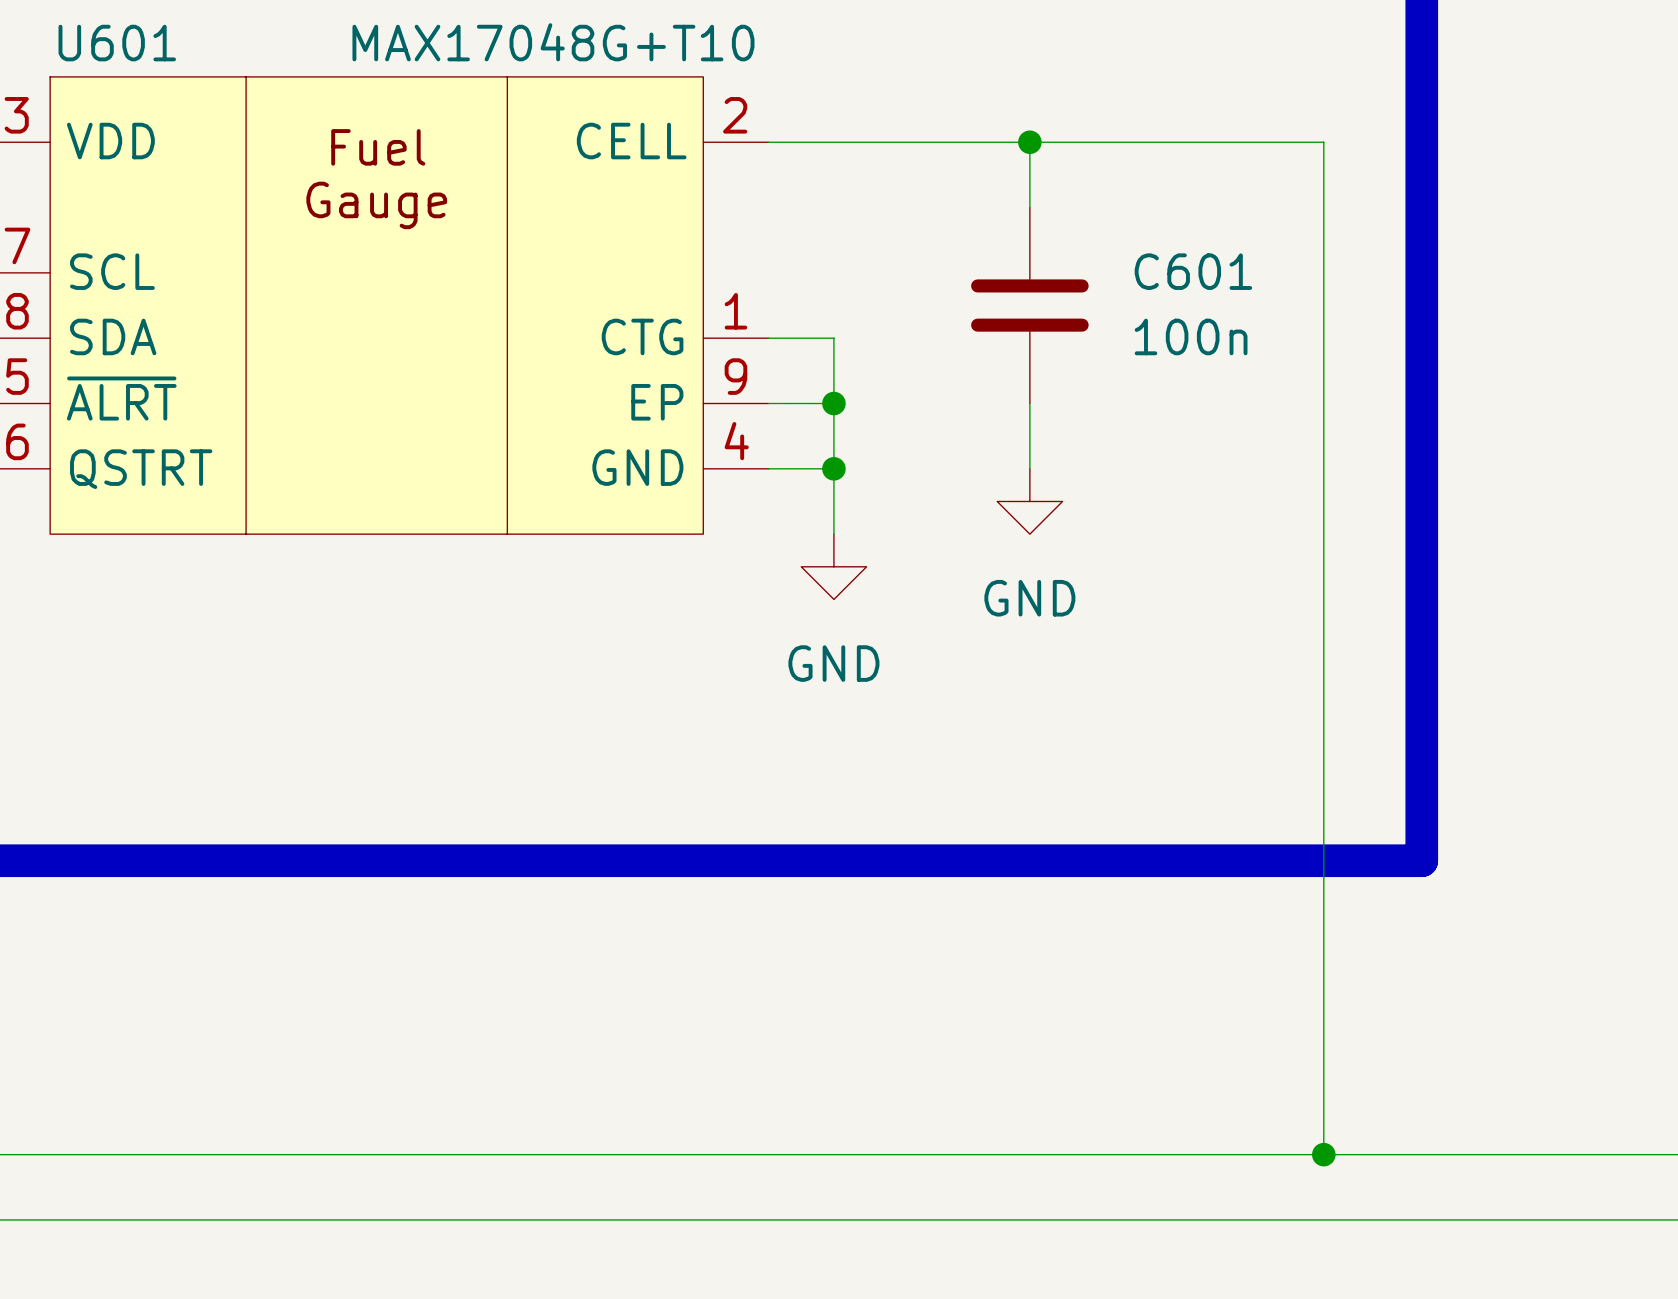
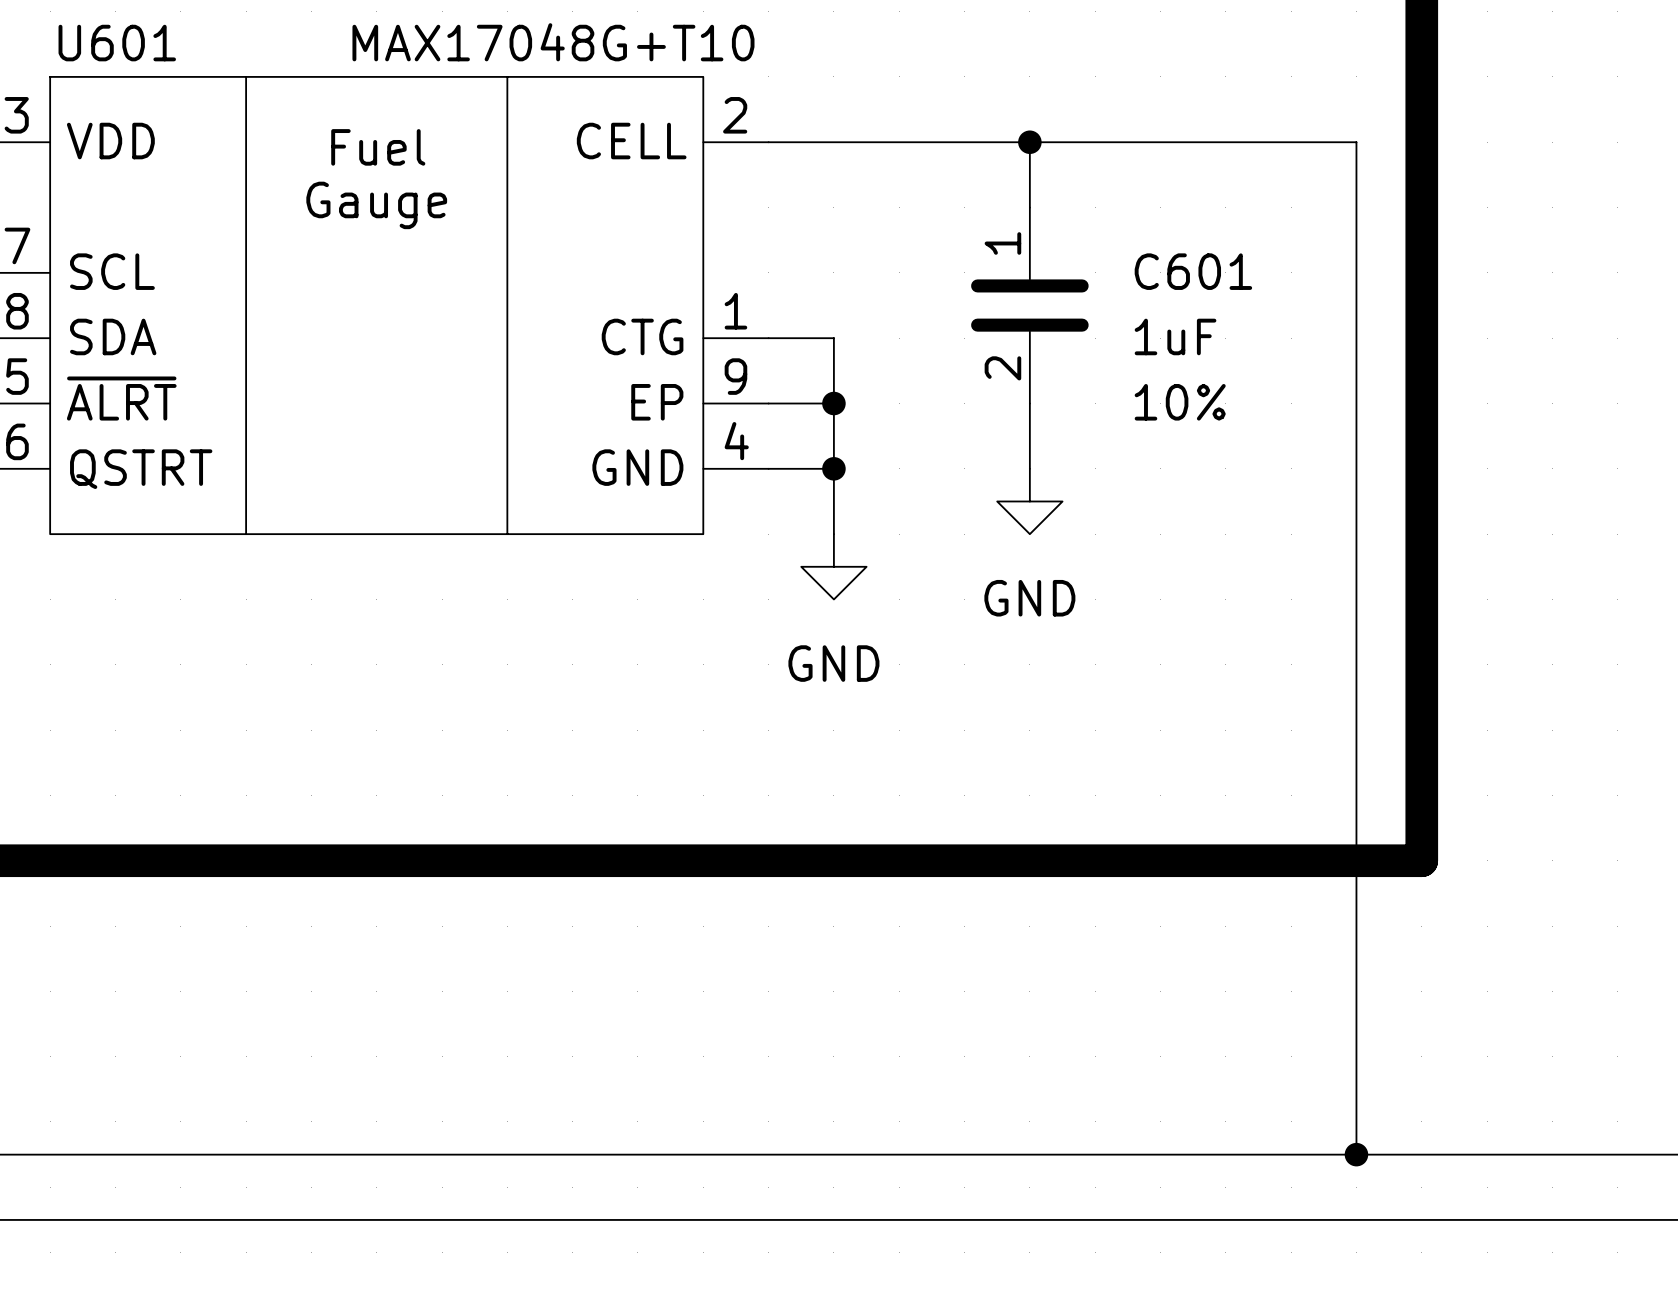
wire: (1323, 142) (1323, 1154) -> (1323, 142) (1356, 142) (1356, 1154)
C601 pin number: none -> 1 (1002, 243)
C601 text: none -> 1uF (1175, 336)
C601 value: 100n (1191, 336) -> none
C601 pin number: none -> 2 (1002, 368)
C601 text: none -> 10% (1180, 402)
junction position: (1323, 1154) -> (1356, 1154)

